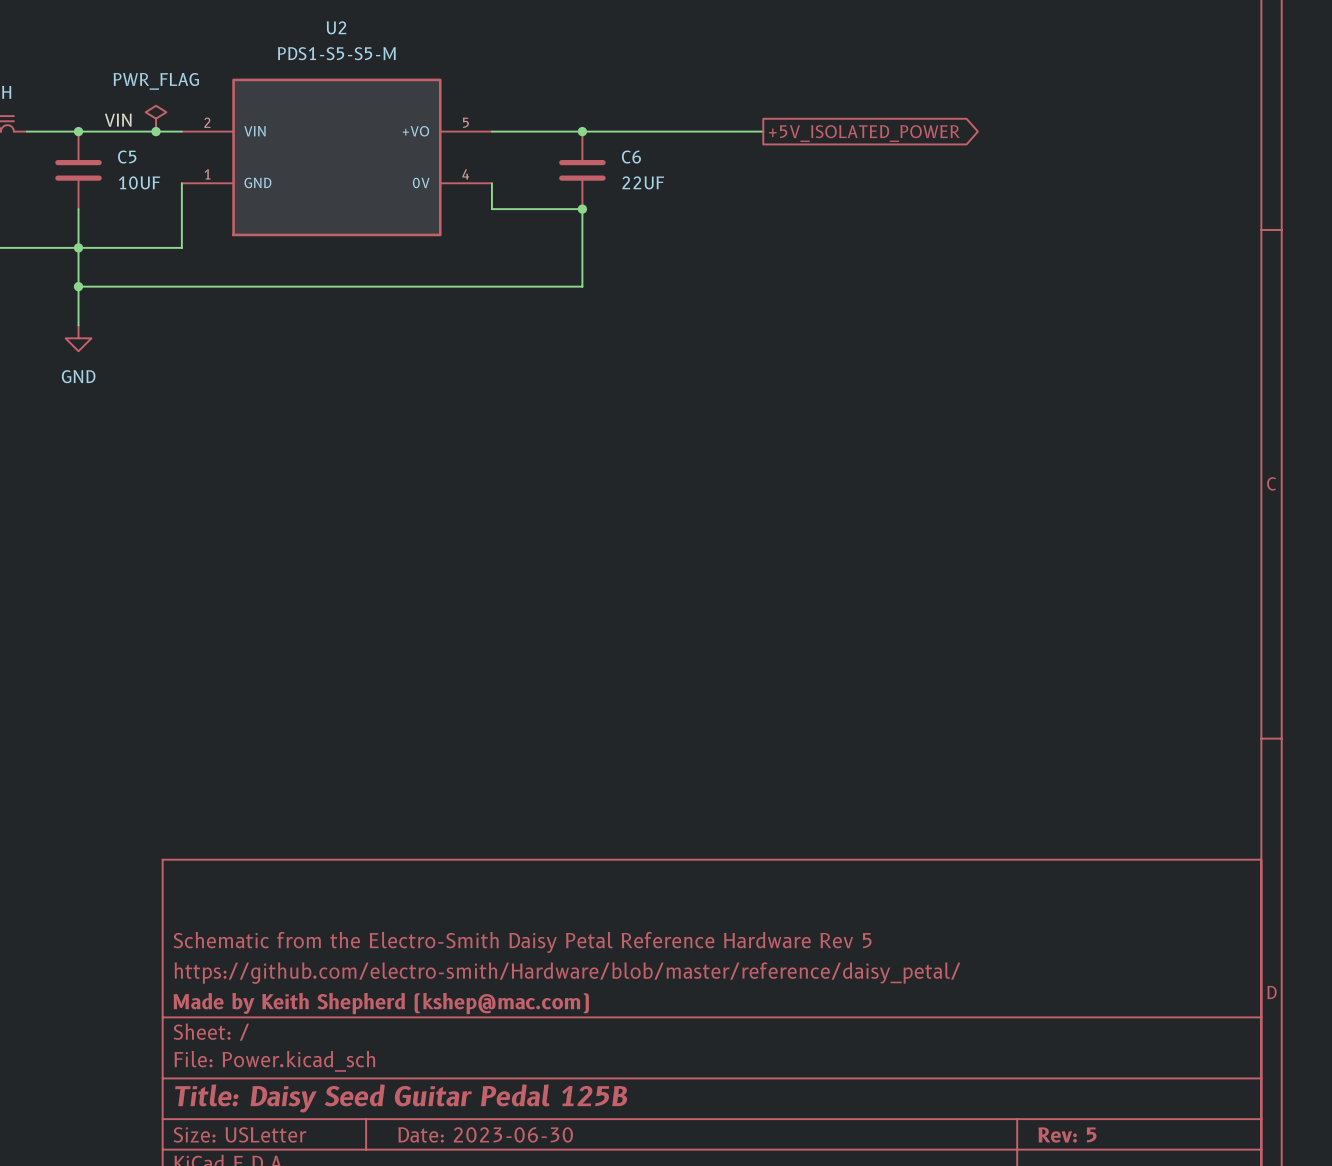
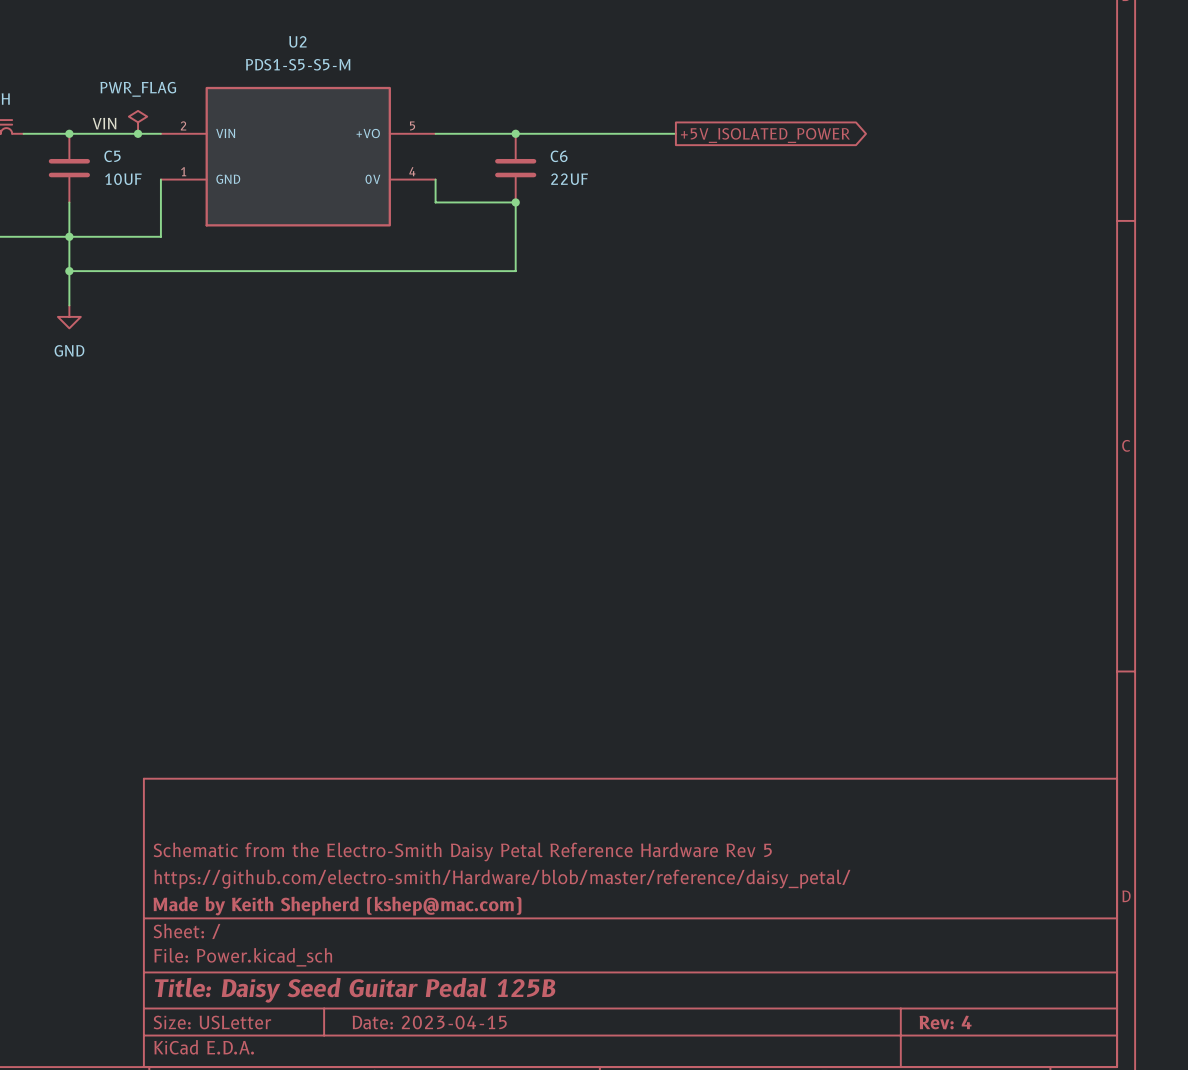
title block: Date: 2023-06-30 (485, 1134) -> Date: 2023-04-15 (429, 1022)
title block: Rev: 5 (1067, 1135) -> Rev: 4 (945, 1022)

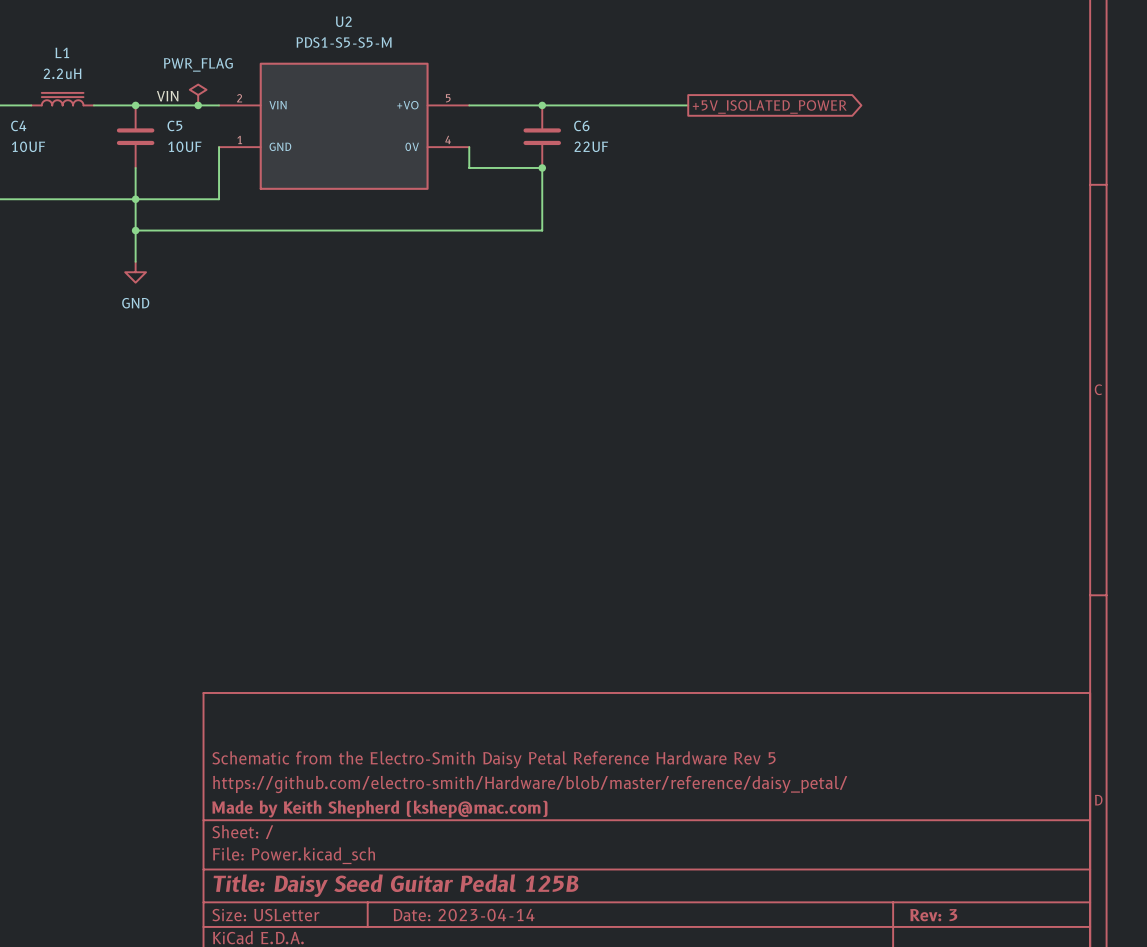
title block: Date: 2023-04-15 (429, 1022) -> Date: 2023-04-14 (464, 915)
title block: Rev: 4 (945, 1022) -> Rev: 3 (933, 915)

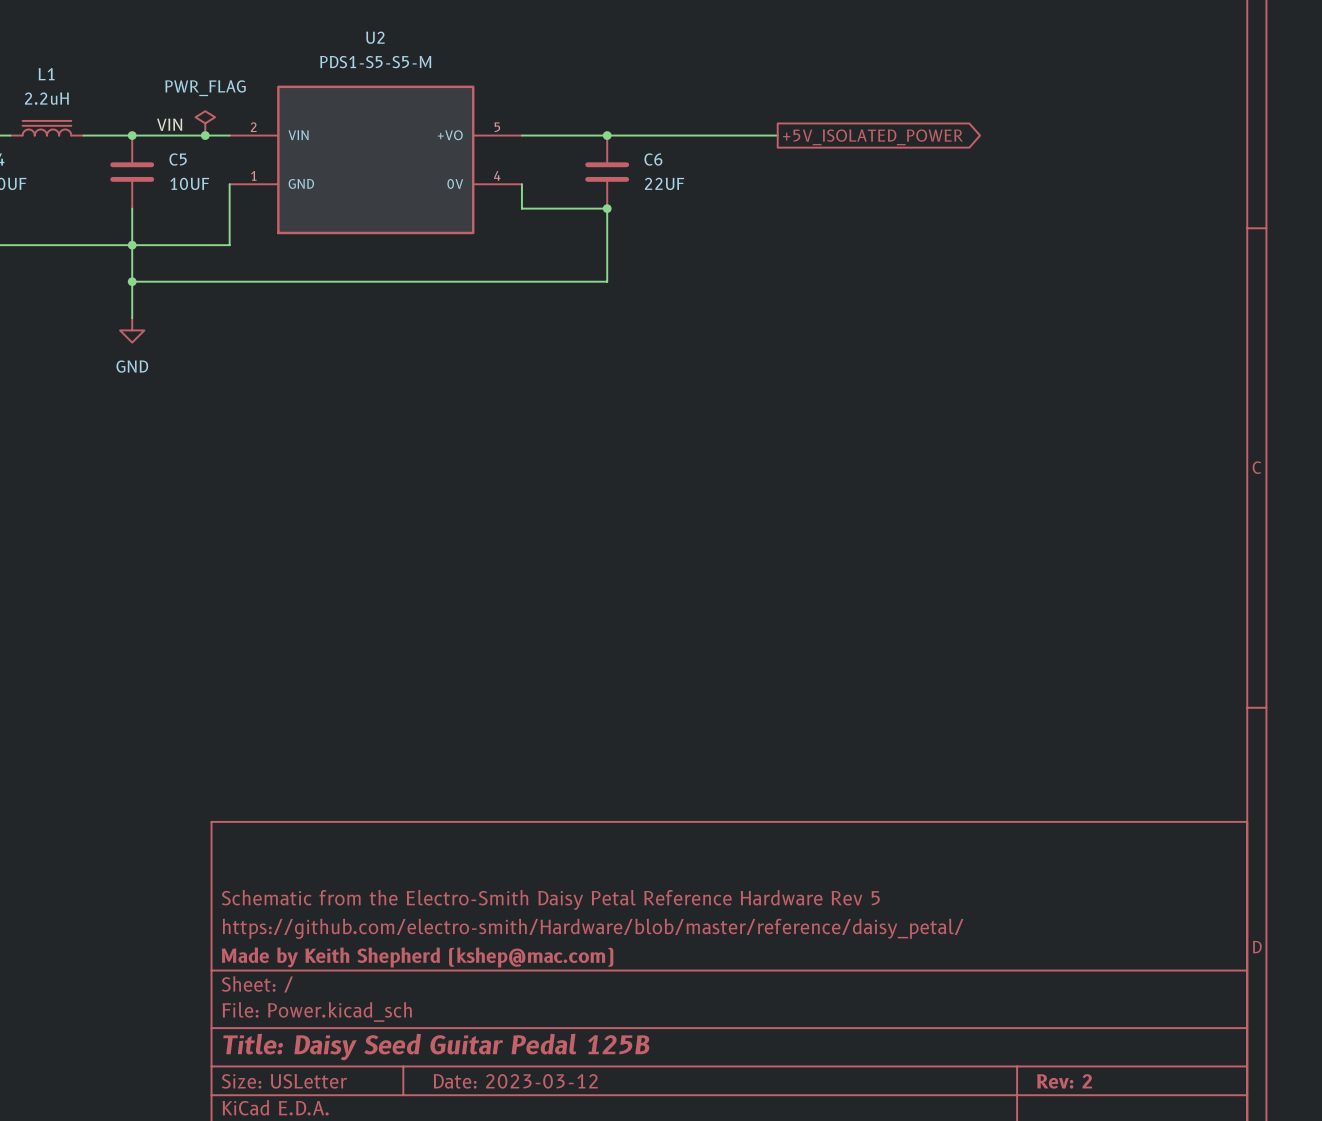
title block: Date: 2023-04-14 (464, 915) -> Date: 2023-03-12 (515, 1081)
title block: Rev: 3 (933, 915) -> Rev: 2 (1064, 1081)

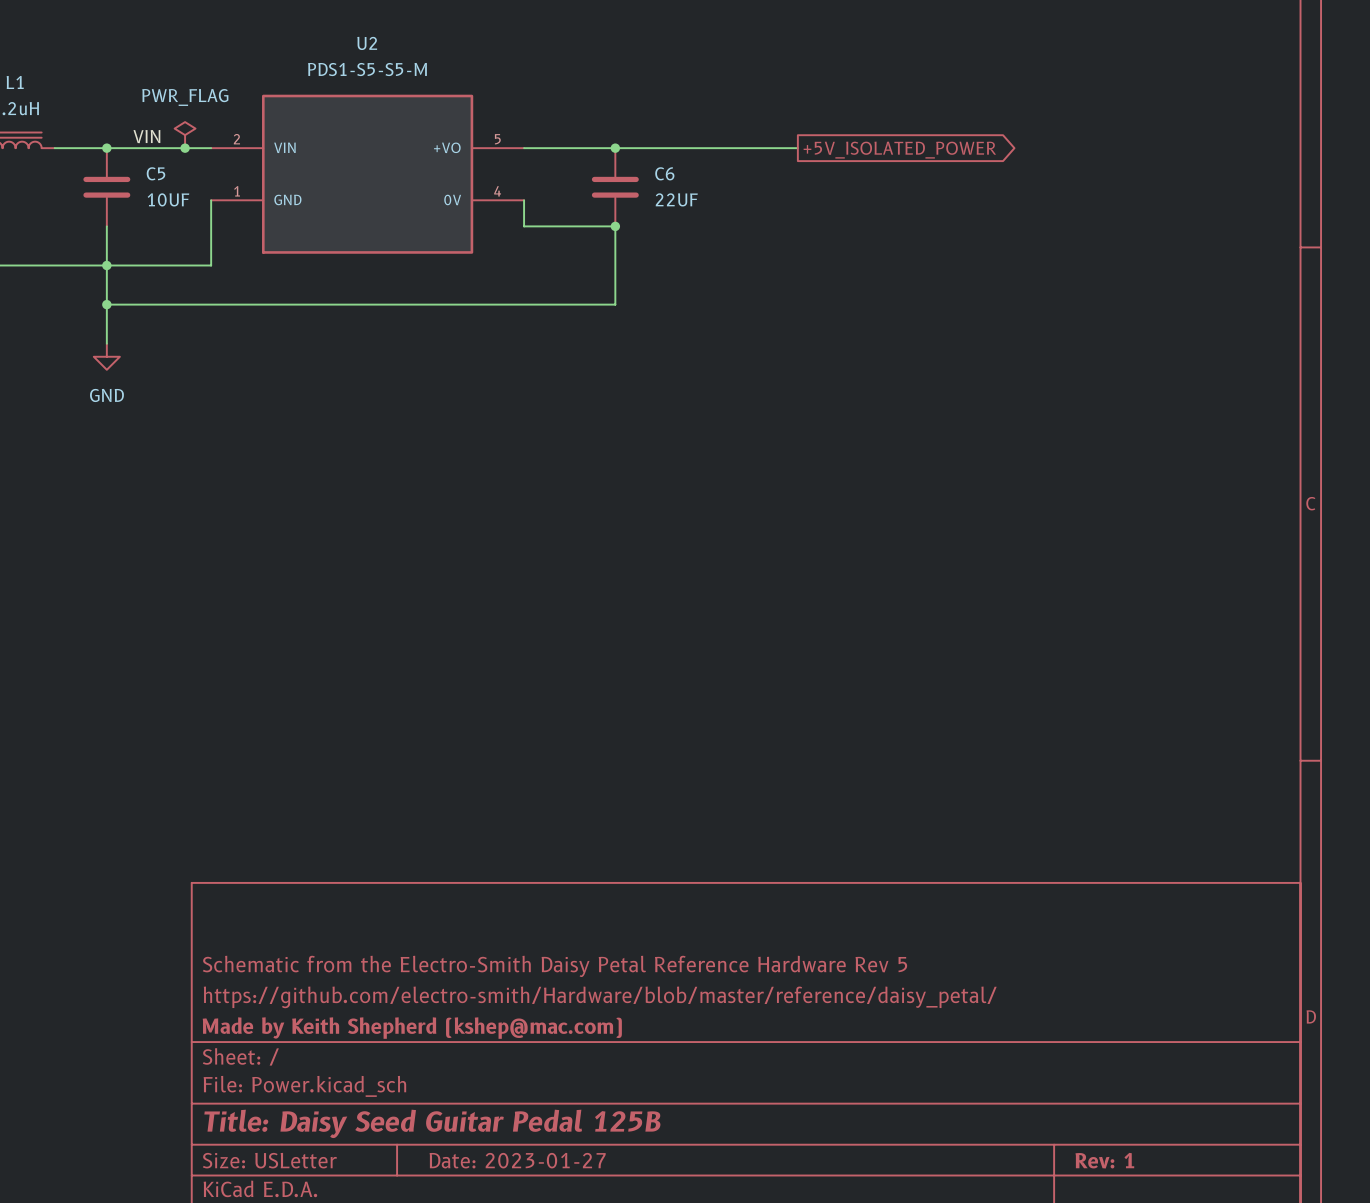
title block: Date: 2023-03-12 (515, 1081) -> Date: 2023-01-27 (517, 1160)
title block: Rev: 2 (1064, 1081) -> Rev: 1 (1104, 1160)

